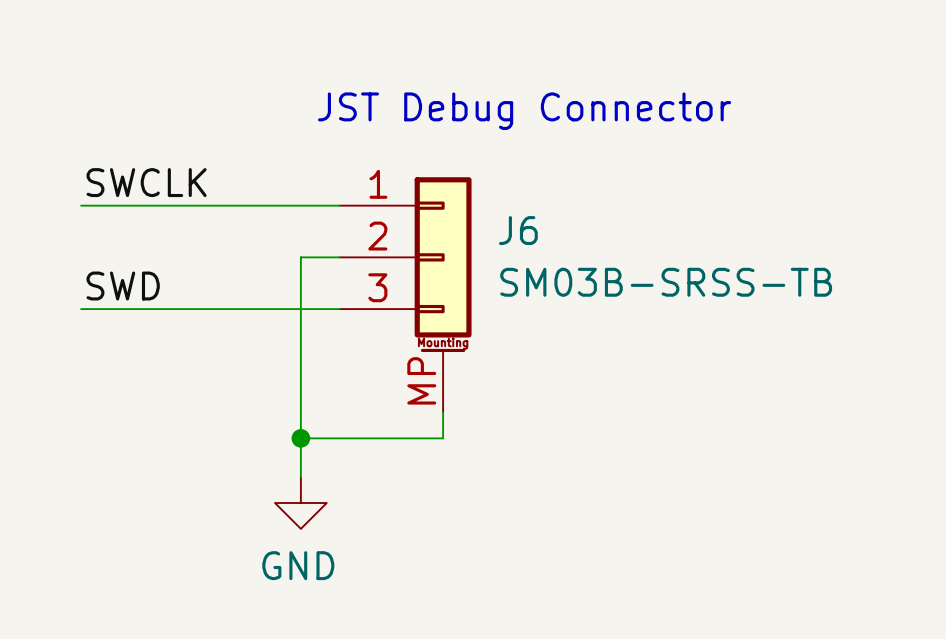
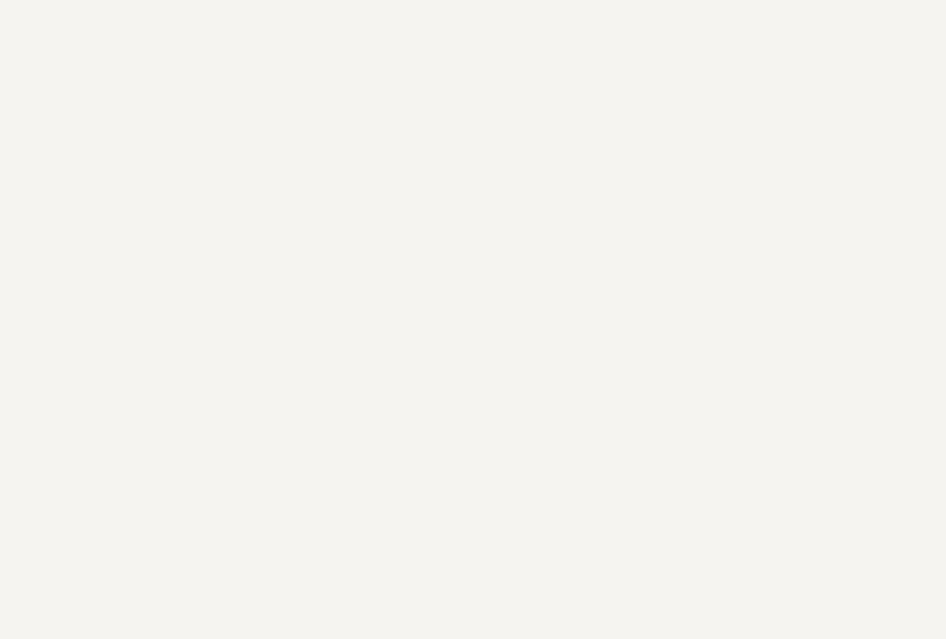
text: JST Debug Connector (524, 111) -> none
label: SWCLK (146, 182) -> none
wire: (81, 205) (339, 205) -> none
wire: (339, 257) (300, 257) (300, 477) -> none
label: SWD (123, 286) -> none
J6: SM03B-SRSS-TB (405, 294) -> none
wire: (81, 309) (339, 309) -> none
wire: (443, 412) (443, 438) (300, 438) -> none
junction: (300, 438) -> none
power symbol: GND (300, 503) -> none

